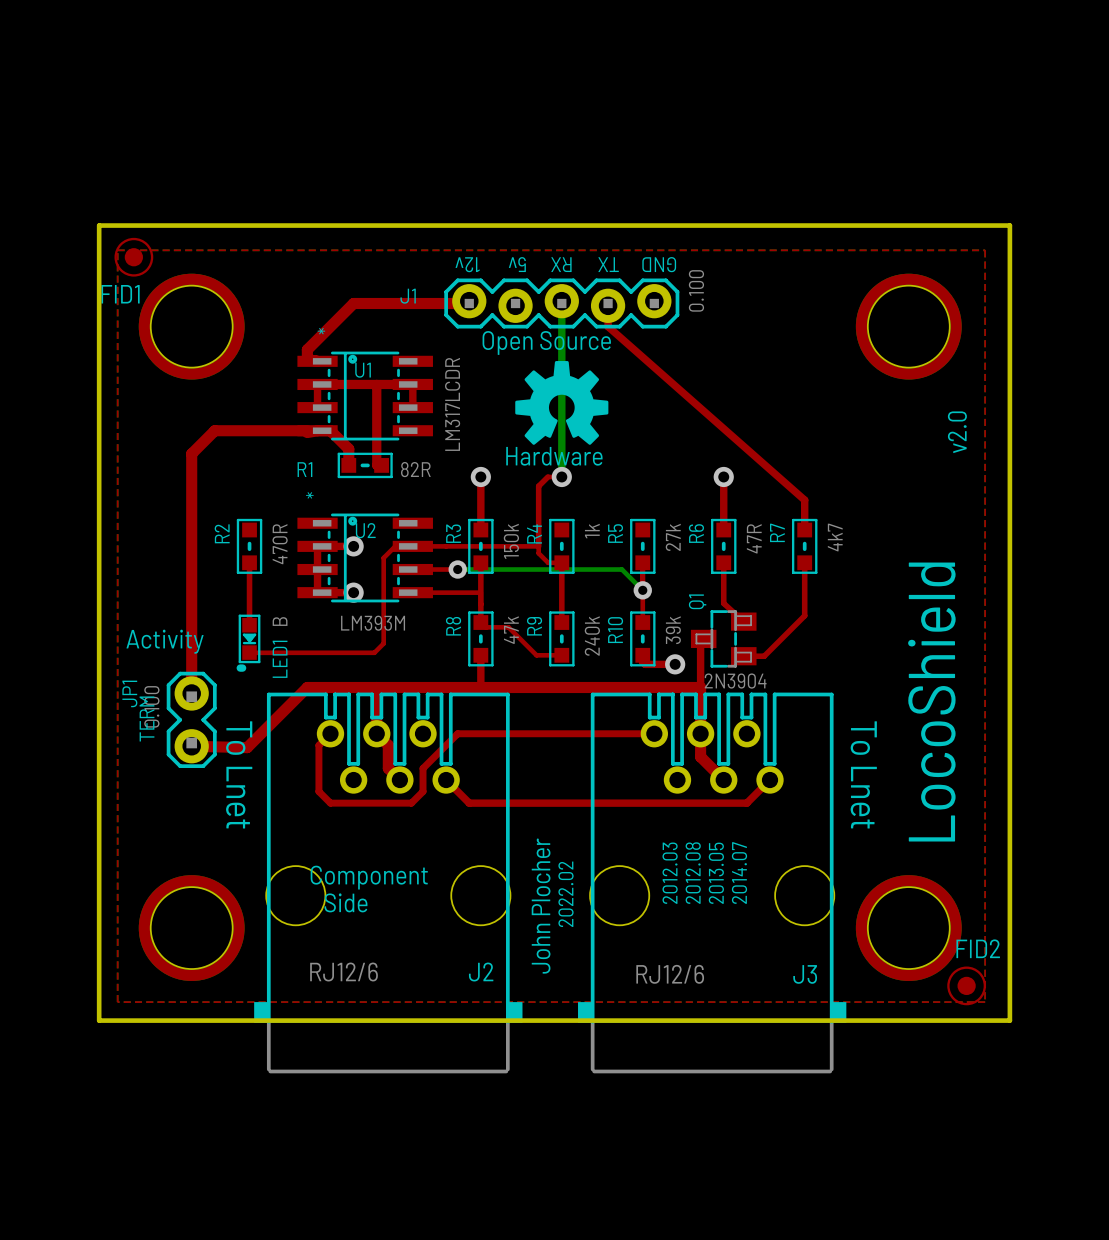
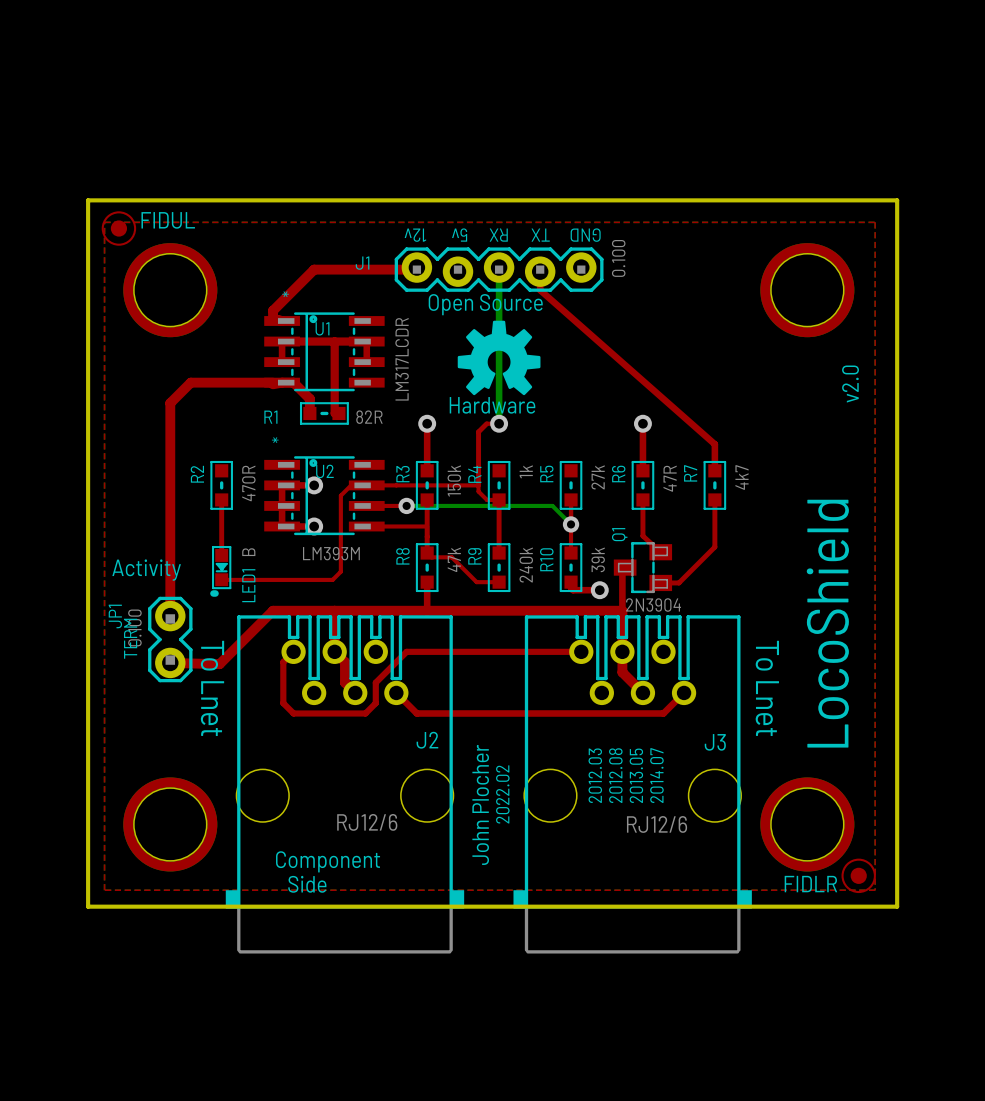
FID1 name: FID1 (120, 294) -> FIDUL (168, 220)
text position: Component (369, 877) -> Component (328, 861)
text position: Side (345, 902) -> Side (307, 884)
FID2 name: FID2 (978, 948) -> FIDLR (810, 884)
J2 value position: RJ12/6 (344, 972) -> RJ12/6 (367, 822)
J2 name position: J2 (481, 972) -> J2 (427, 740)
J3 value position: RJ12/6 (670, 974) -> RJ12/6 (657, 824)
J3 name position: J3 (805, 974) -> J3 (715, 742)

